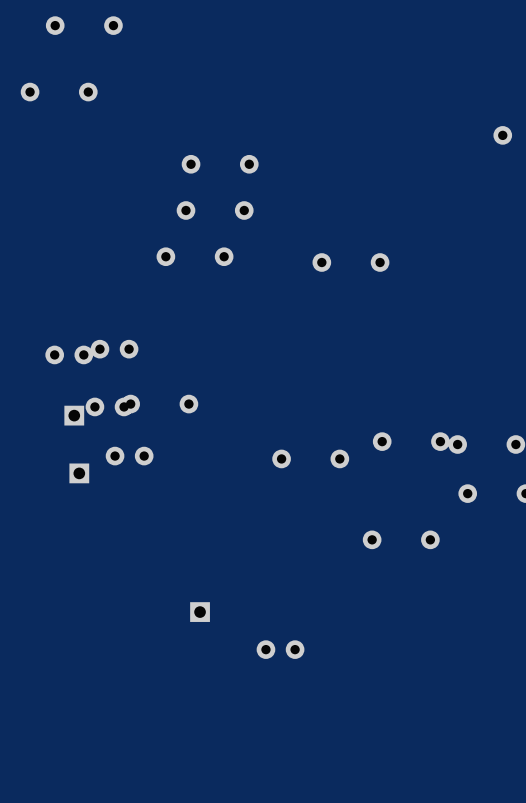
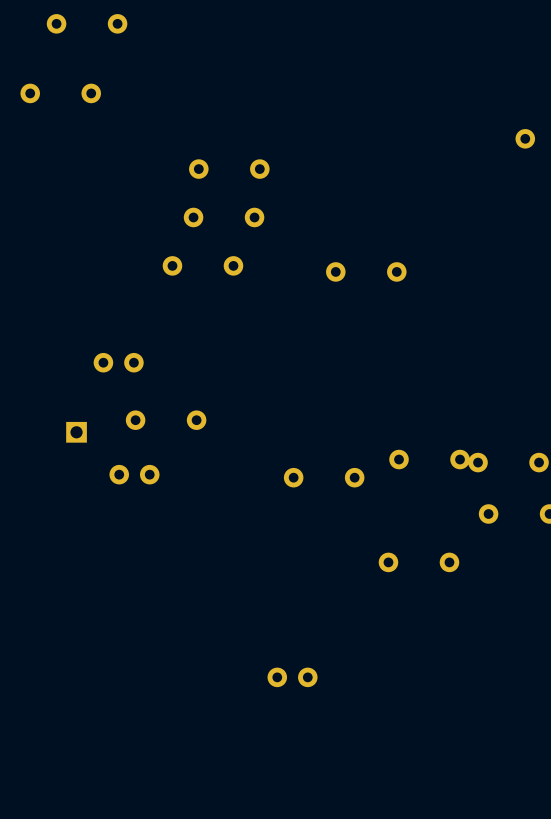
part: (69, 354) -> none
part: (109, 406) -> none
part: (79, 473) -> none
part: (200, 612) -> none

